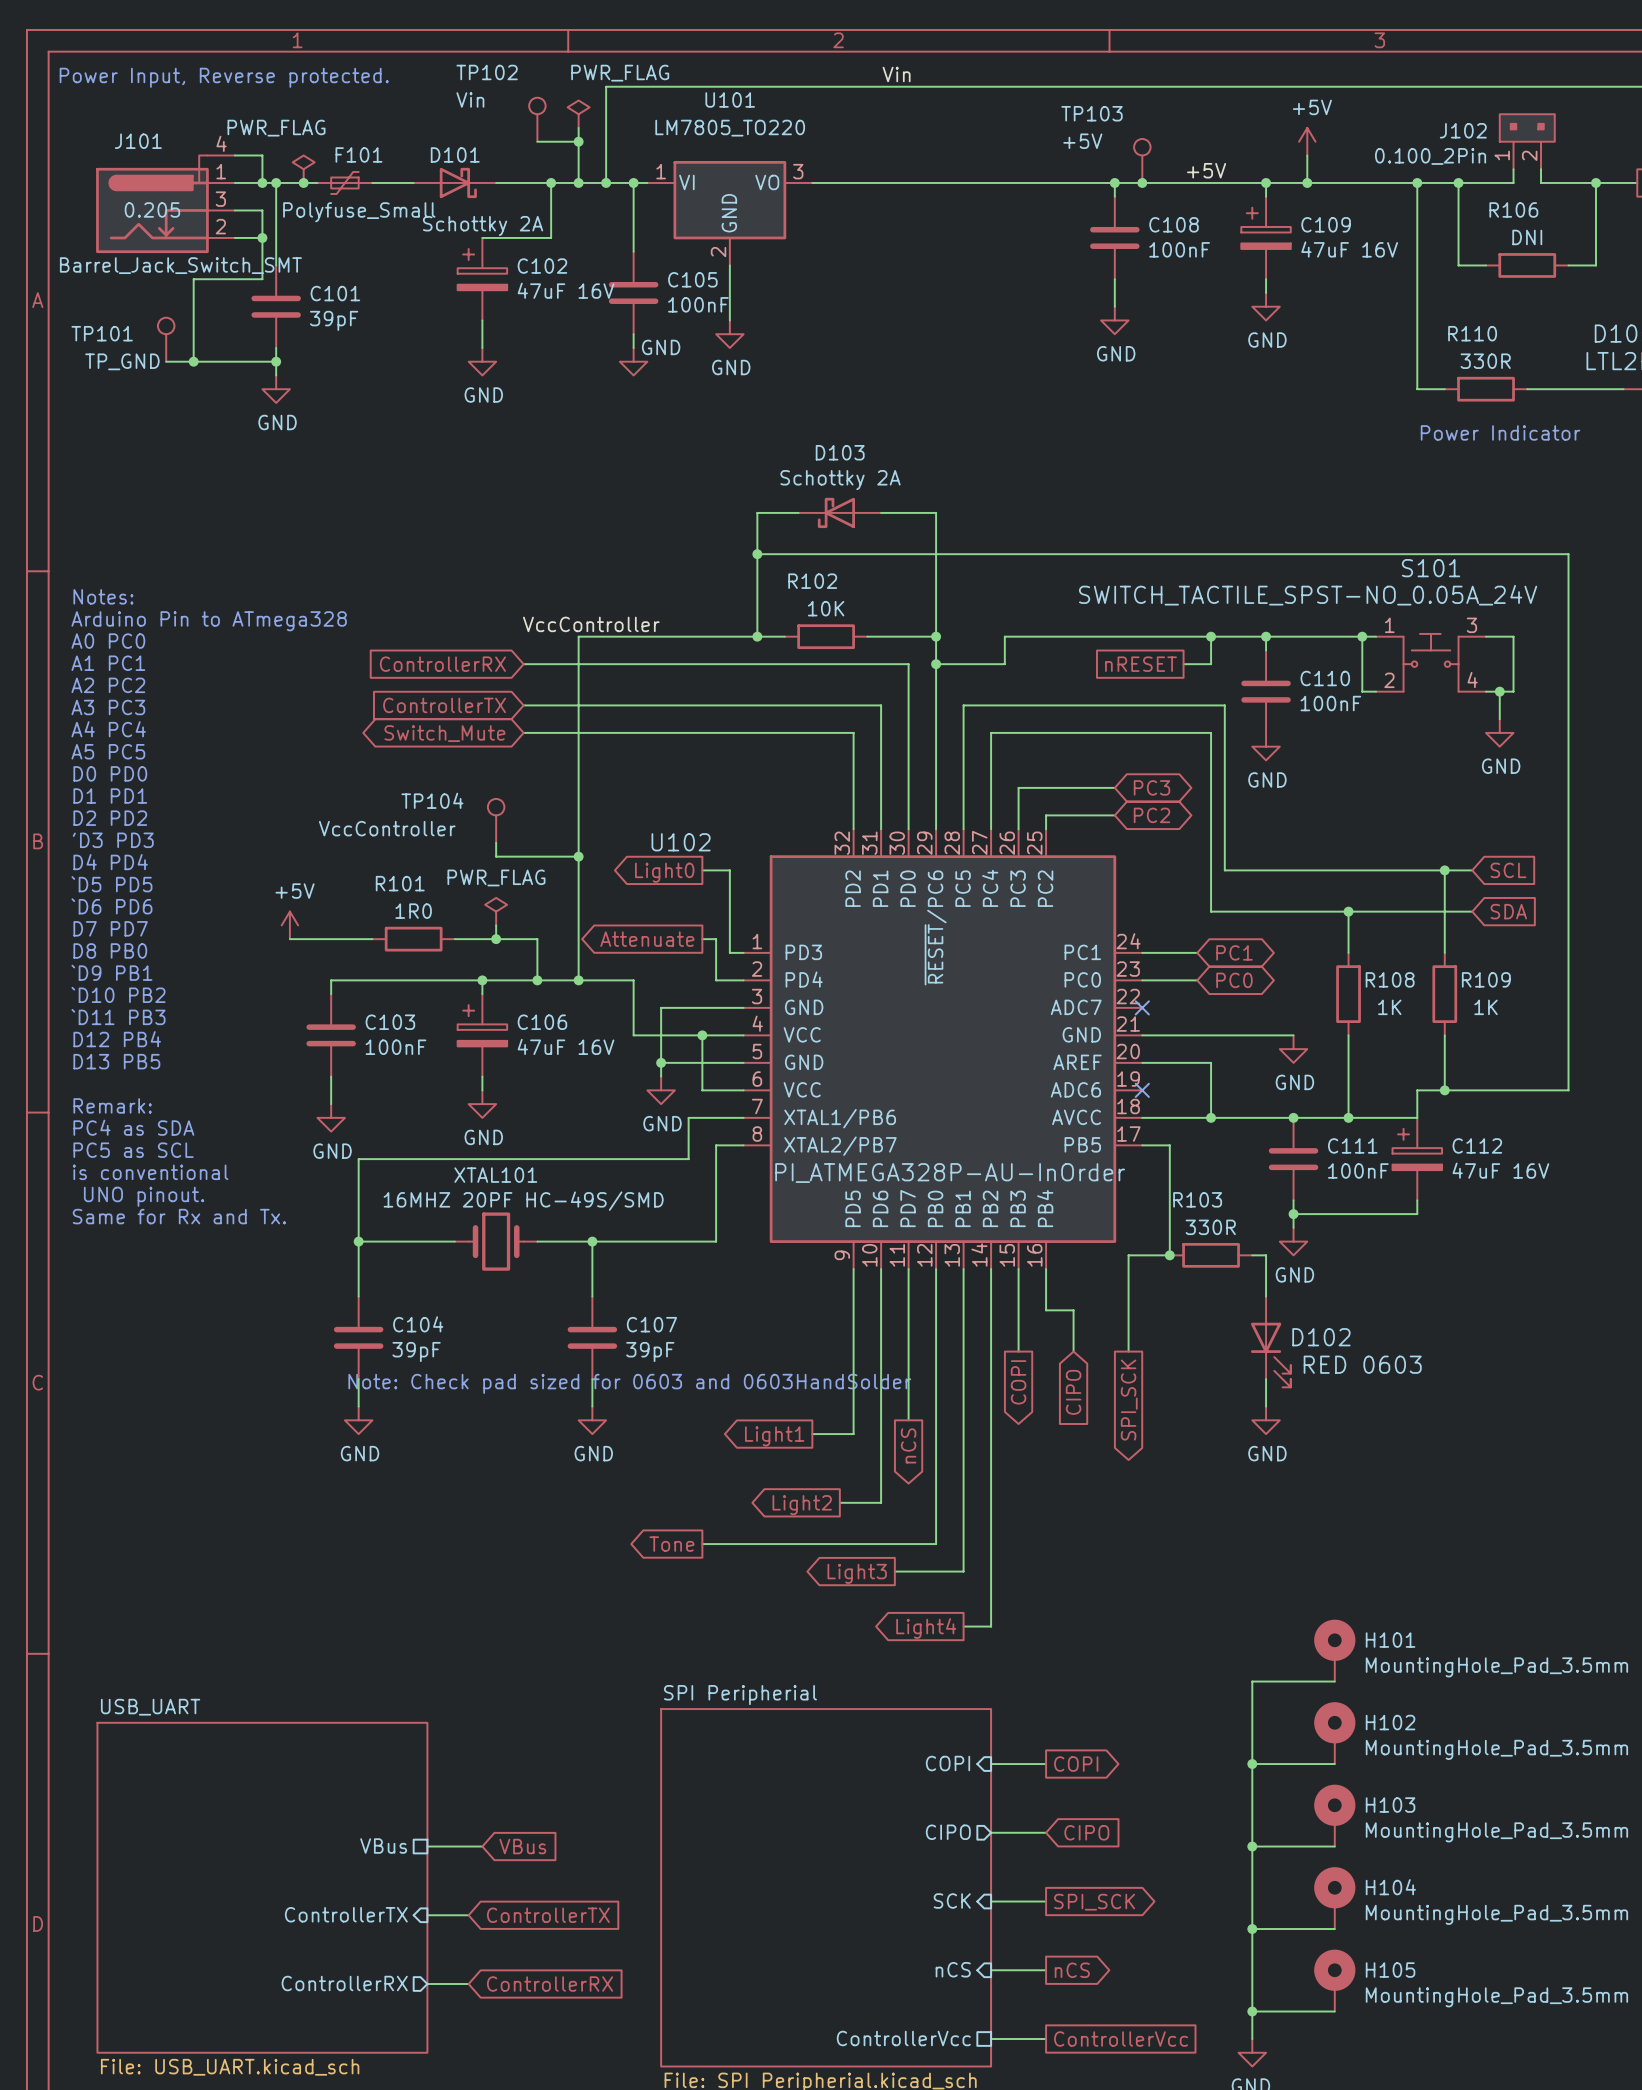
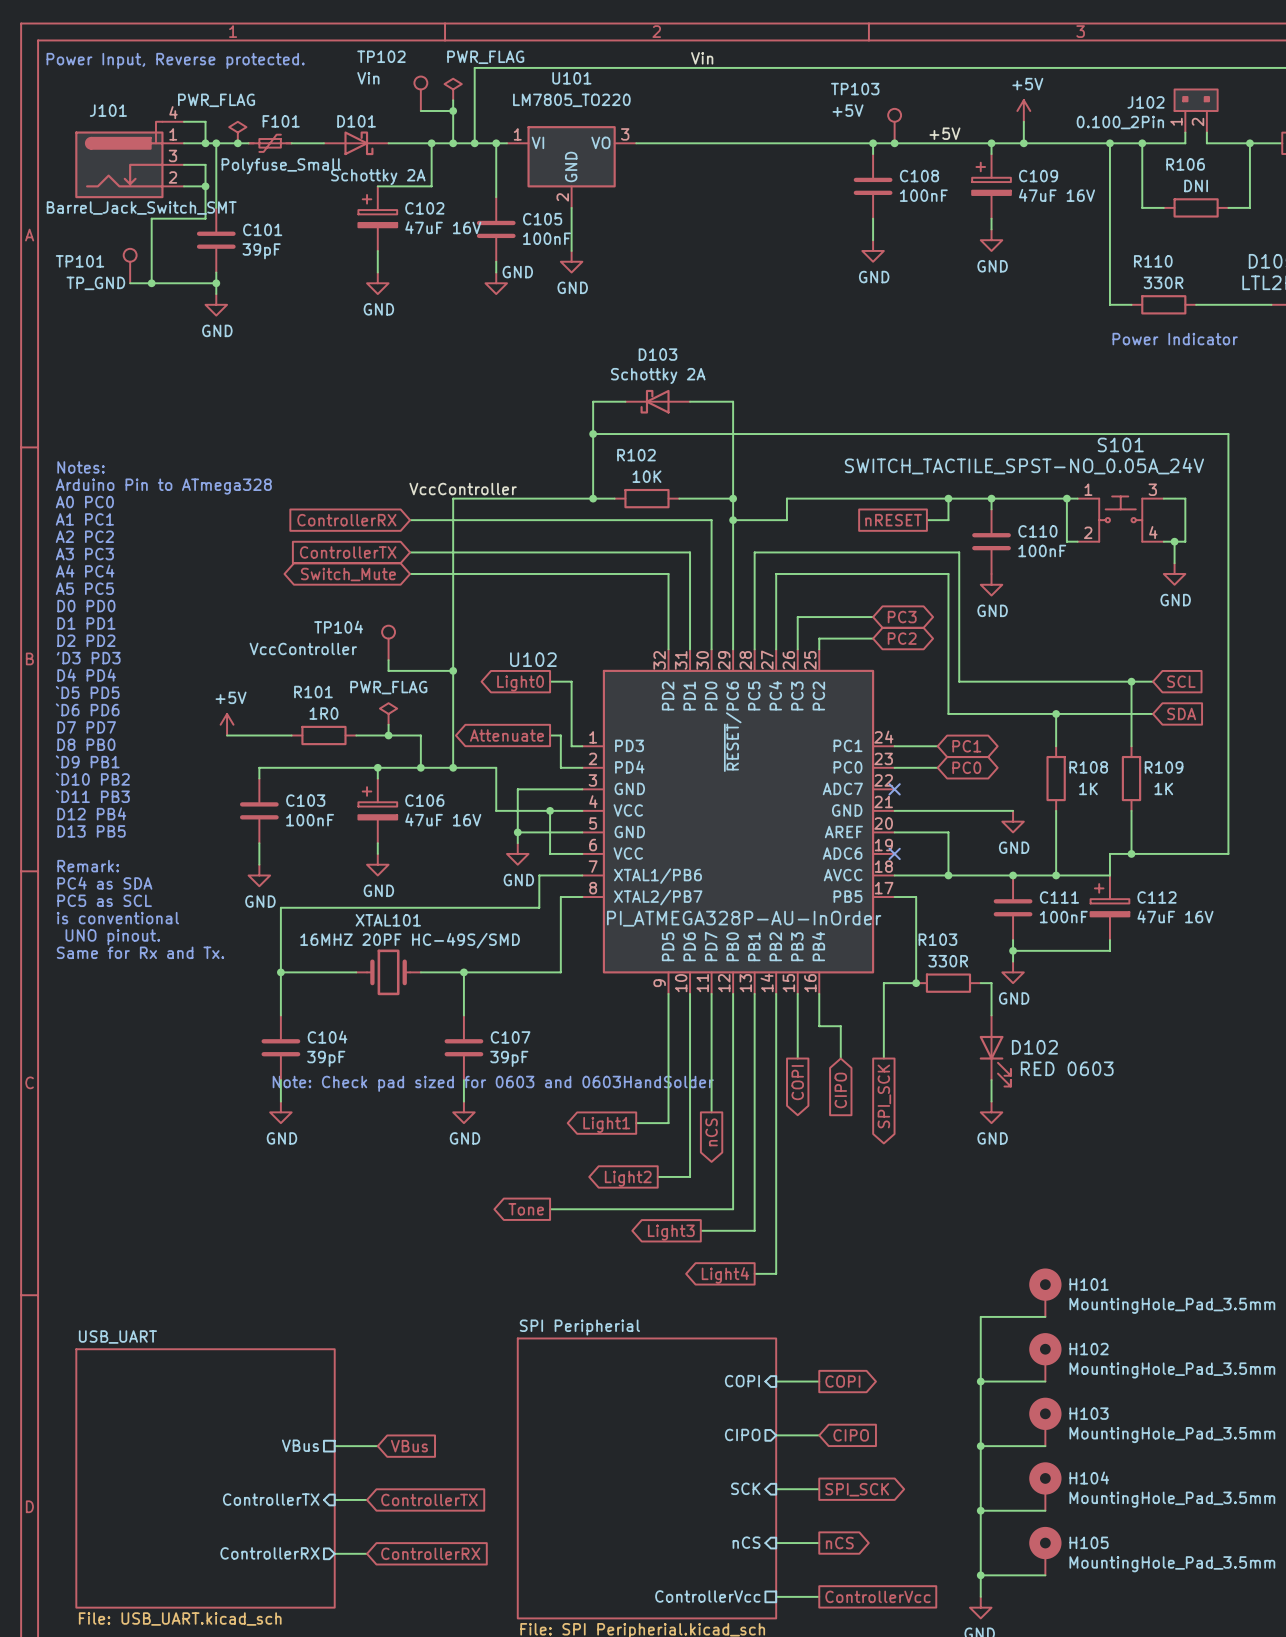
J101 text: 0.205 (152, 209) -> none

